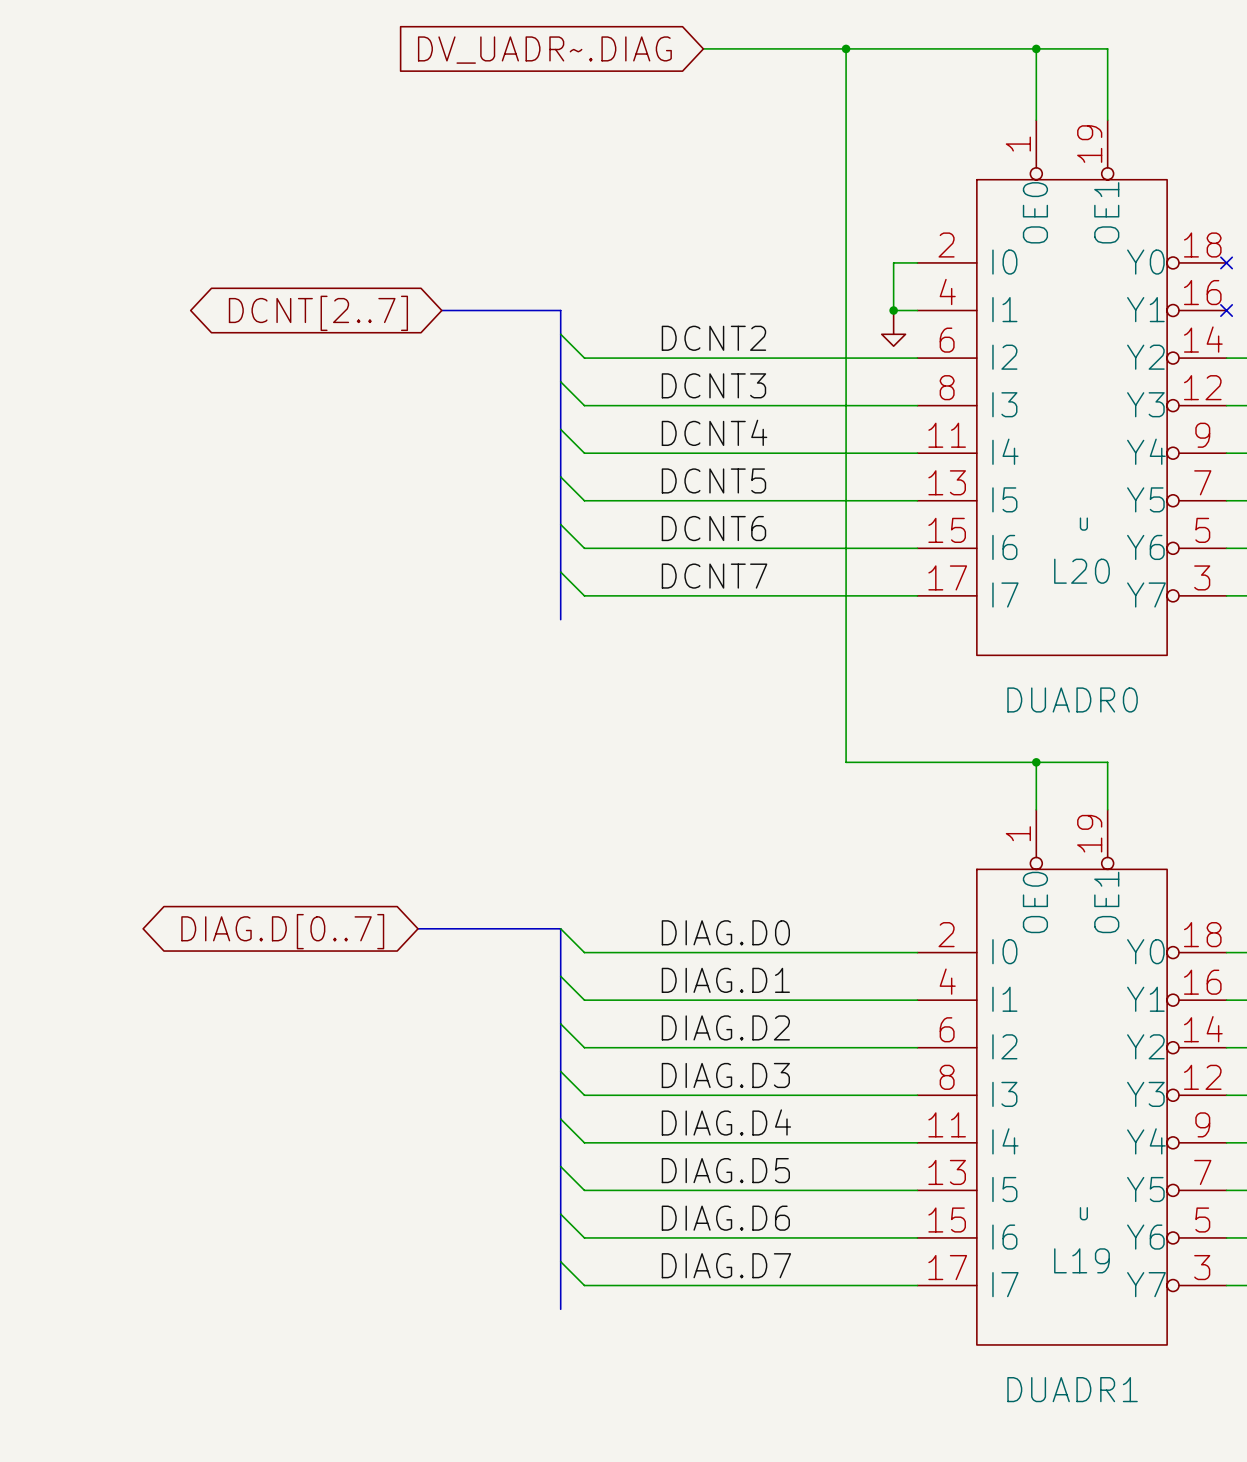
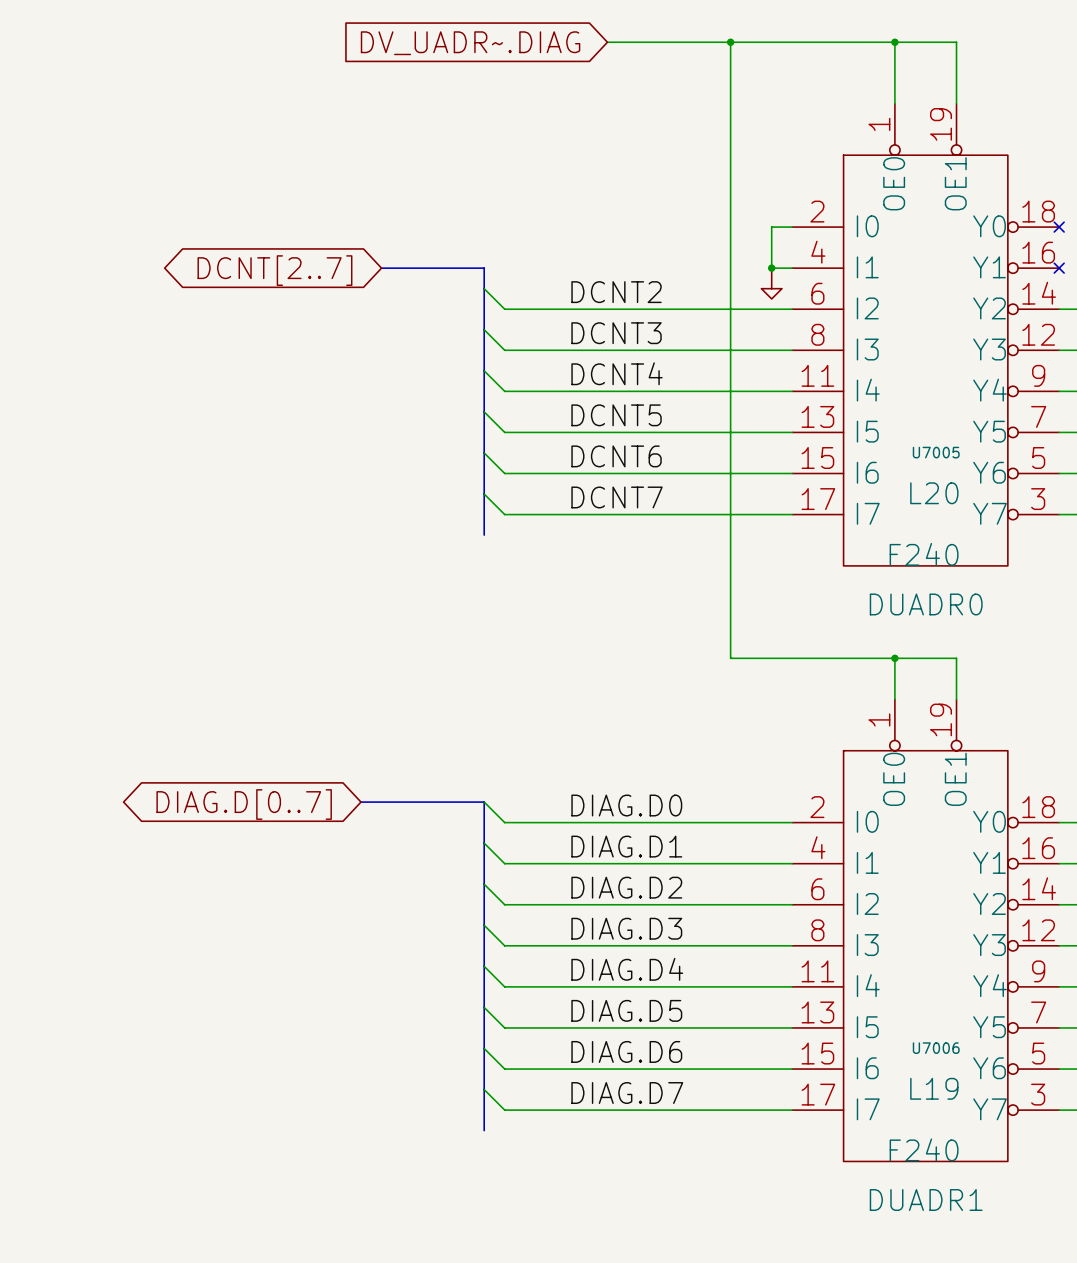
U name: U (1083, 524) -> U7005 (936, 452)
U value: none -> F240 (924, 554)
U name: U (1083, 1213) -> U7006 (936, 1048)
U value: none -> F240 (924, 1149)

